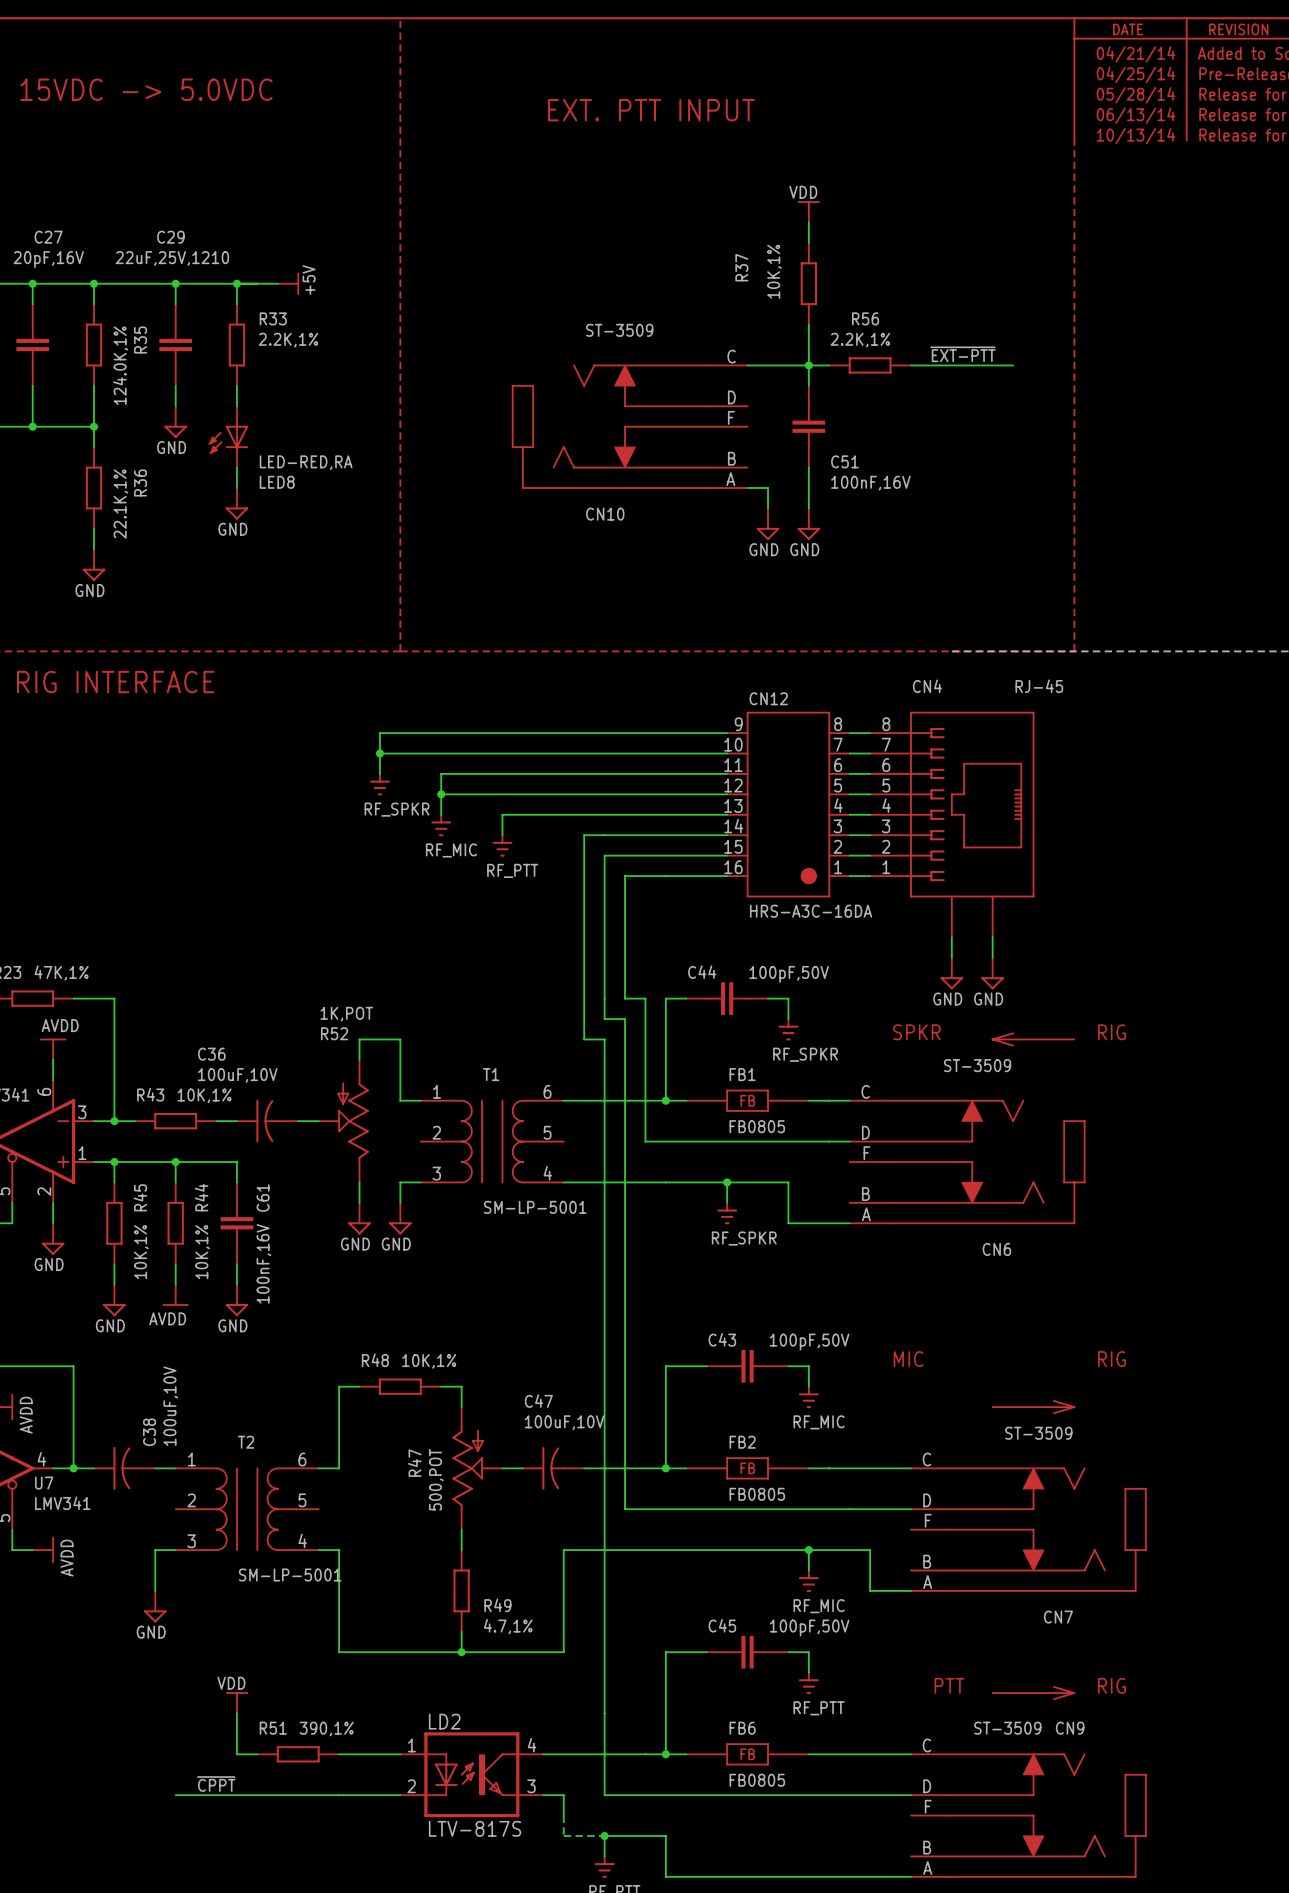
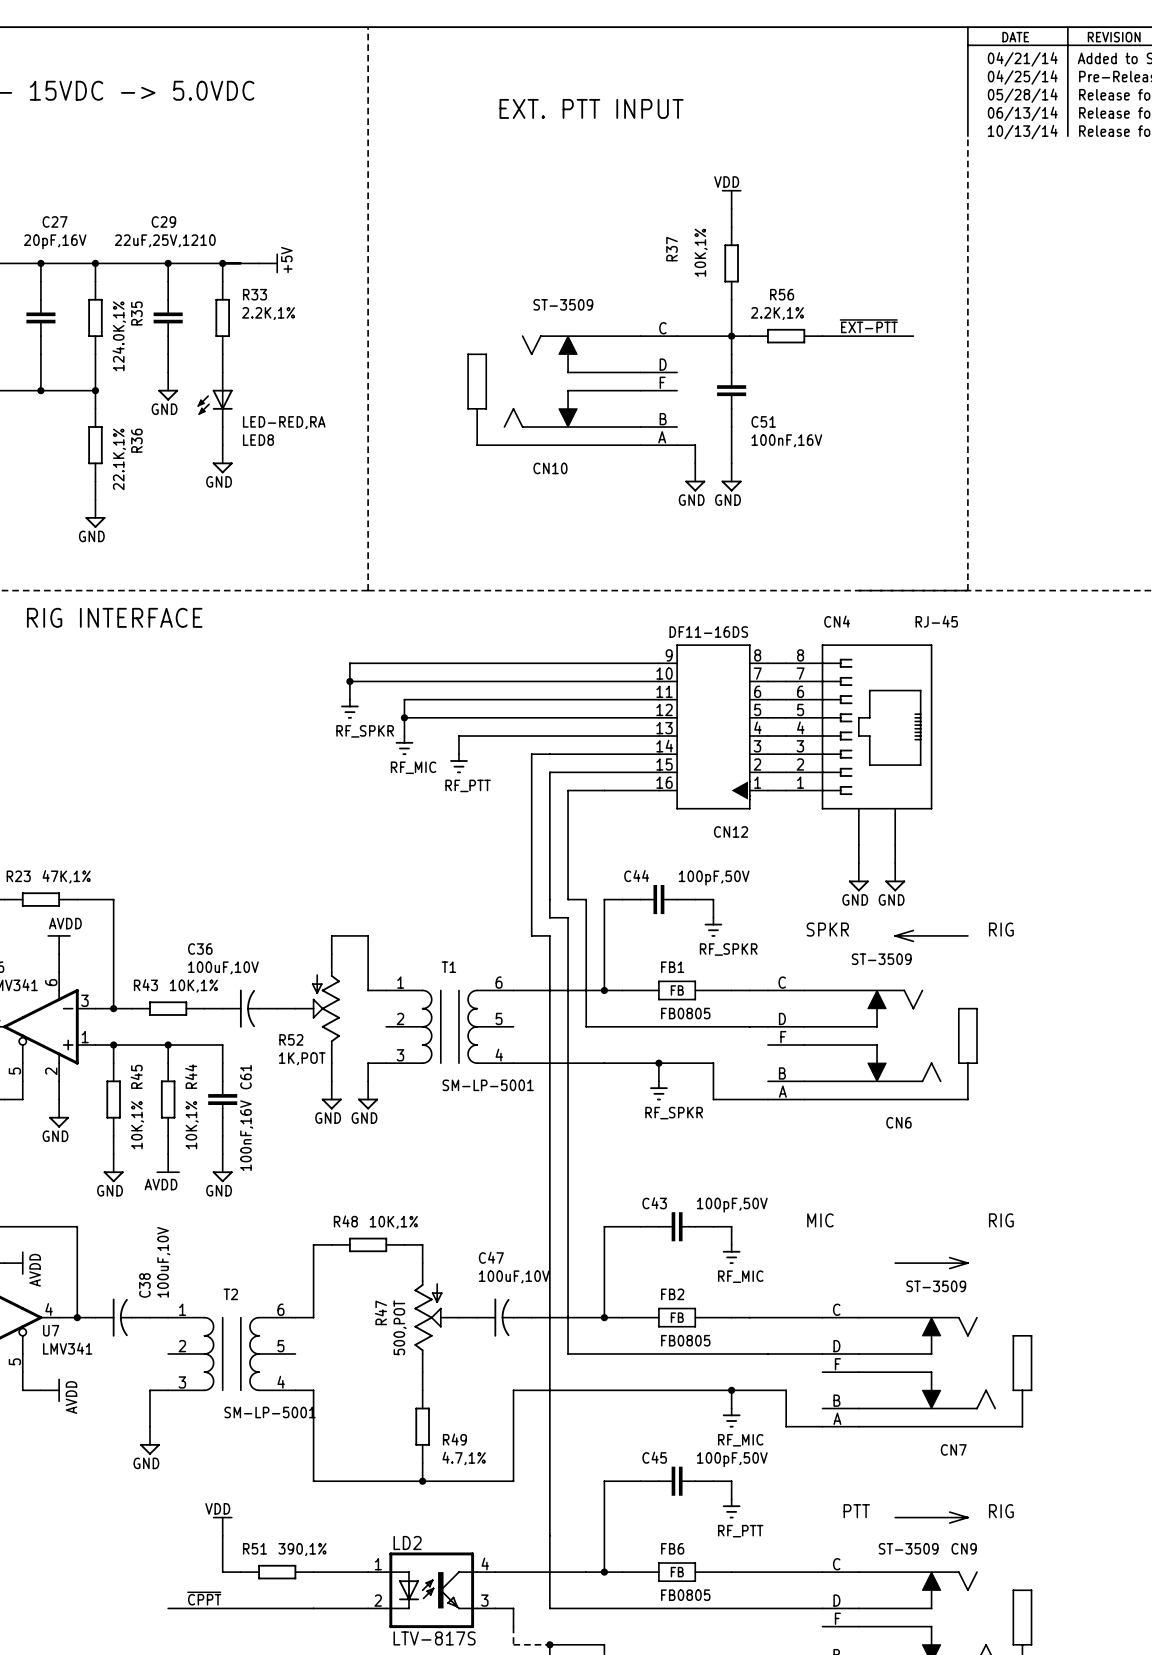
CN12 name position: CN12 (768, 698) -> CN12 (731, 831)
CN12 symbol: [727, 712, 850, 898] -> [658, 644, 768, 810]
CN12 value: HRS-A3C-16DA (811, 911) -> DF11-16DS (708, 632)
R52 value position: 1K,POT (346, 1014) -> 1K,POT (302, 1058)
R52 name position: R52 (334, 1033) -> R52 (291, 1039)

